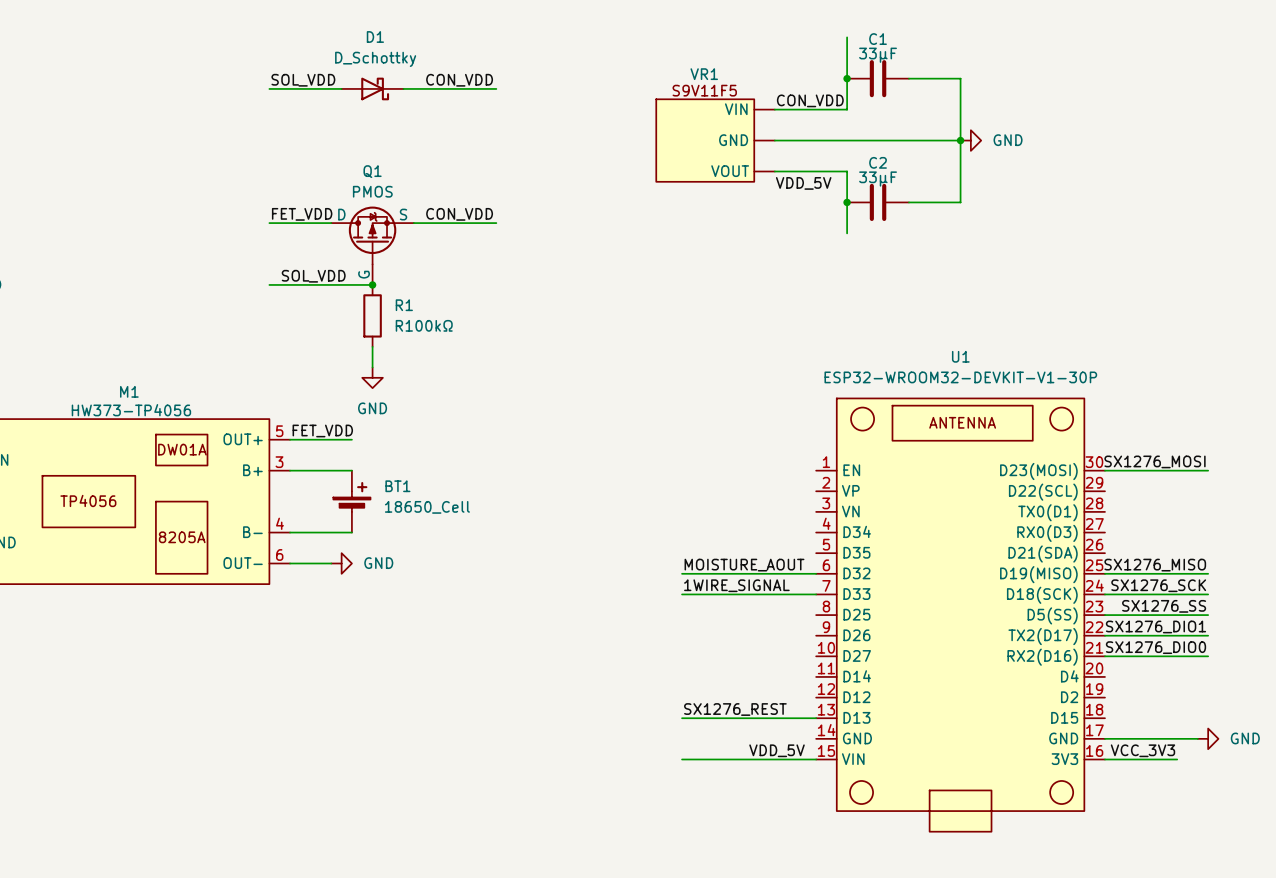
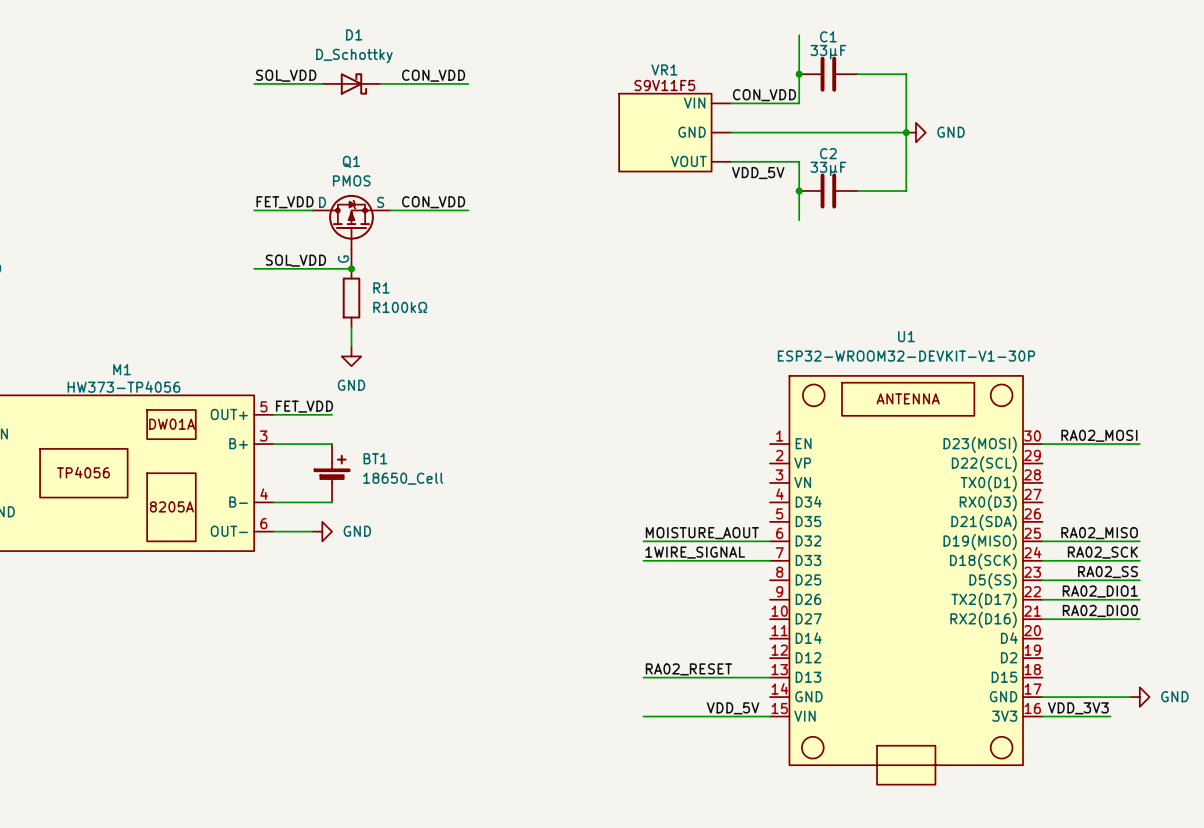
label: SX1276_MOSI (1155, 461) -> RA02_MOSI (1099, 435)
label: SX1276_MISO (1155, 565) -> RA02_MISO (1099, 533)
label: SX1276_SCK (1158, 585) -> RA02_SCK (1102, 552)
label: SX1276_SS (1164, 606) -> RA02_SS (1107, 572)
label: SX1276_DIO1 (1155, 626) -> RA02_DIO1 (1100, 591)
label: SX1276_DIO0 (1155, 647) -> RA02_DIO0 (1100, 610)
label: SX1276_REST (735, 709) -> RA02_RESET (688, 669)
label: VCC_3V3 (1142, 750) -> VDD_3V3 (1078, 708)

